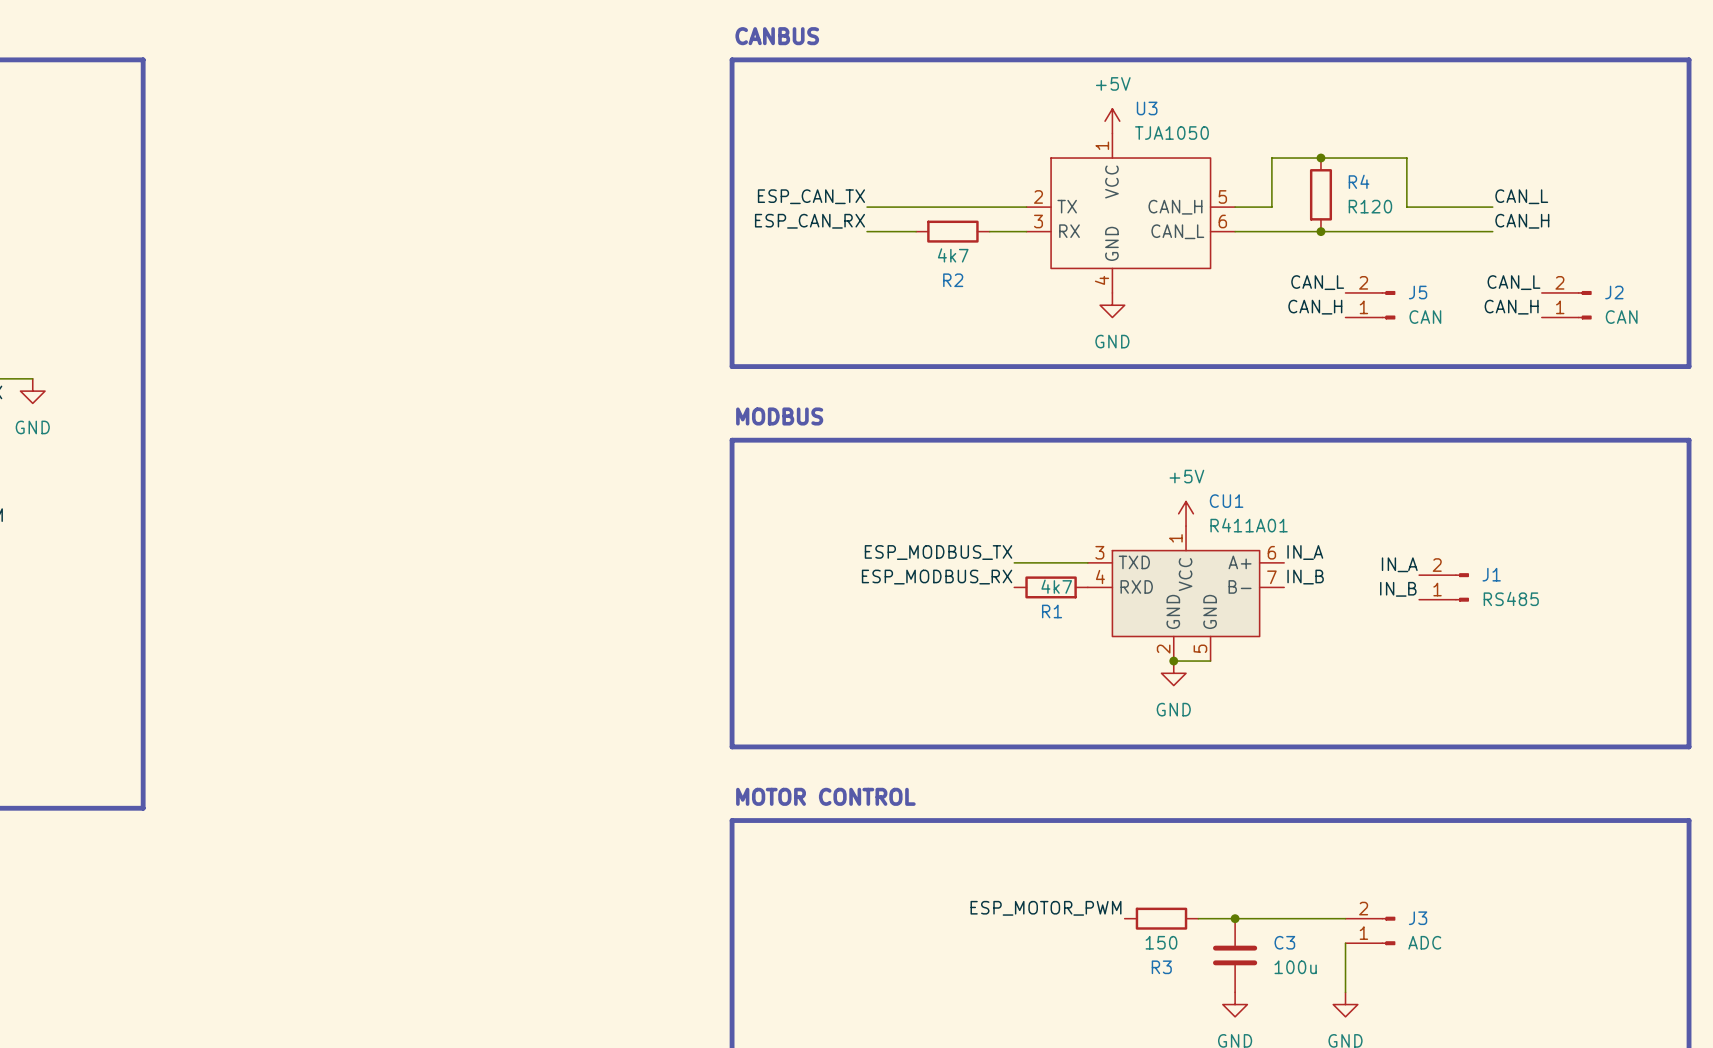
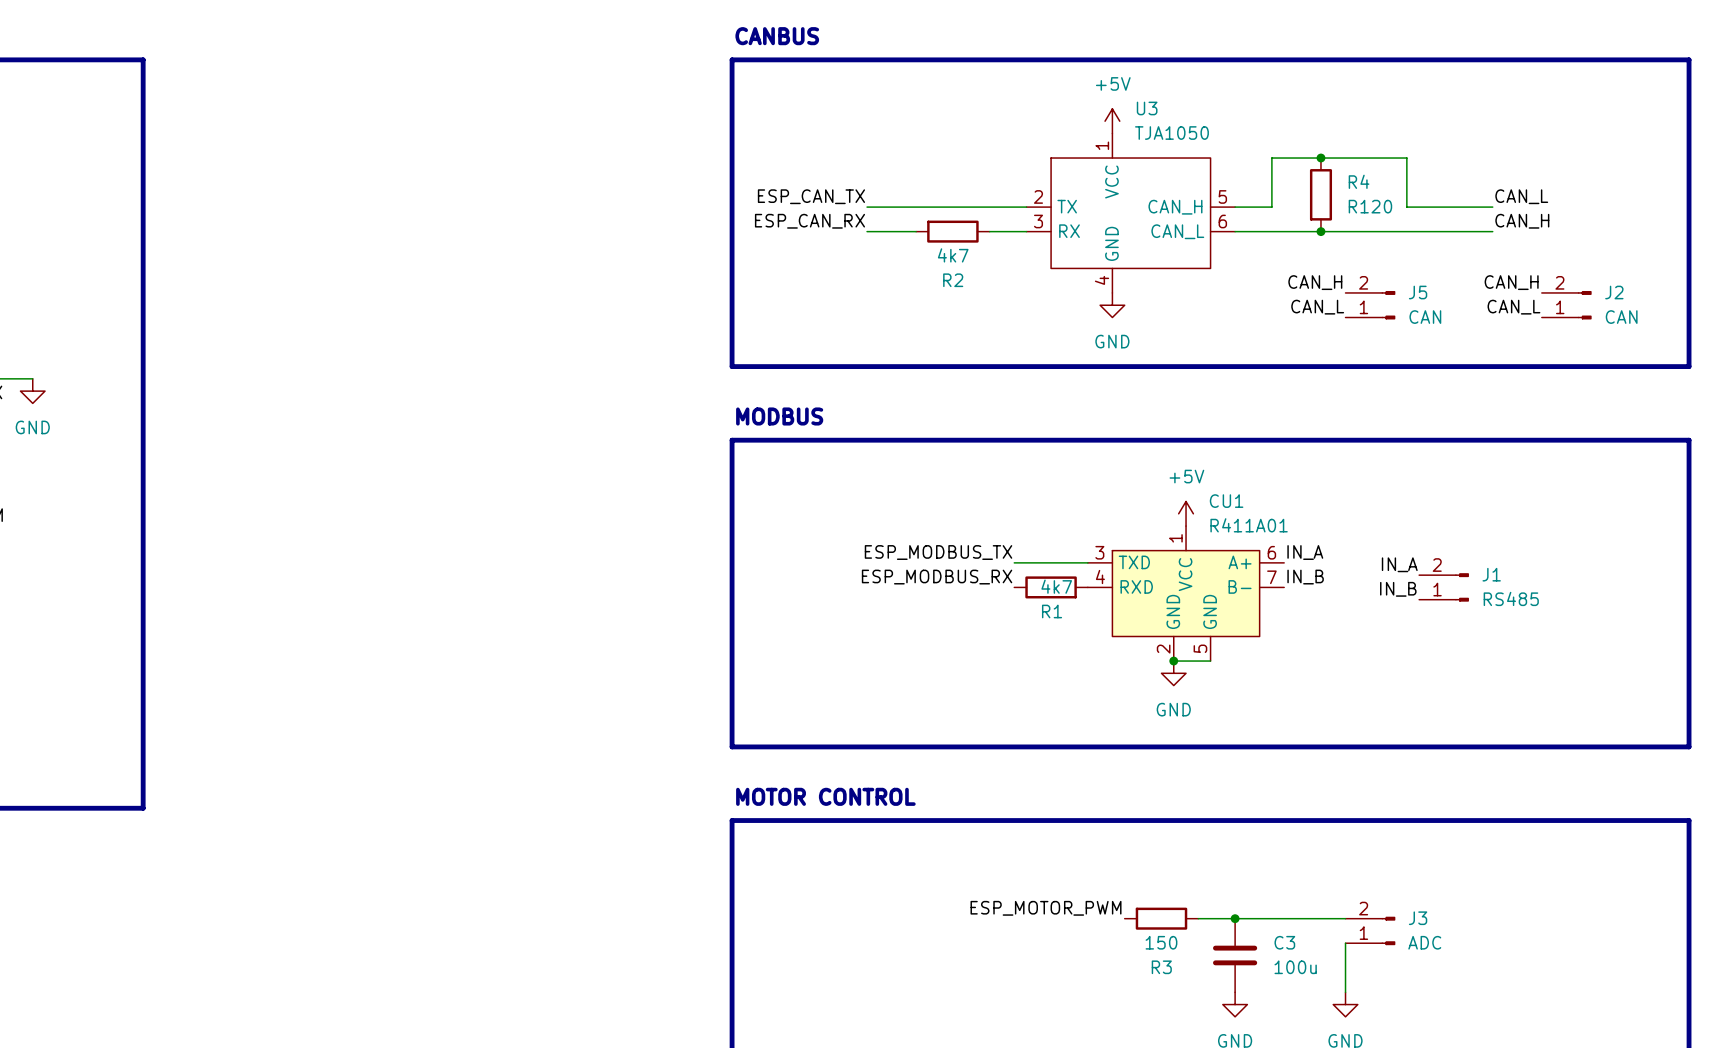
label: CAN_L (1317, 282) -> CAN_H (1315, 282)
label: CAN_L (1513, 282) -> CAN_H (1511, 282)
label: CAN_H (1315, 307) -> CAN_L (1317, 307)
label: CAN_H (1511, 307) -> CAN_L (1513, 307)

